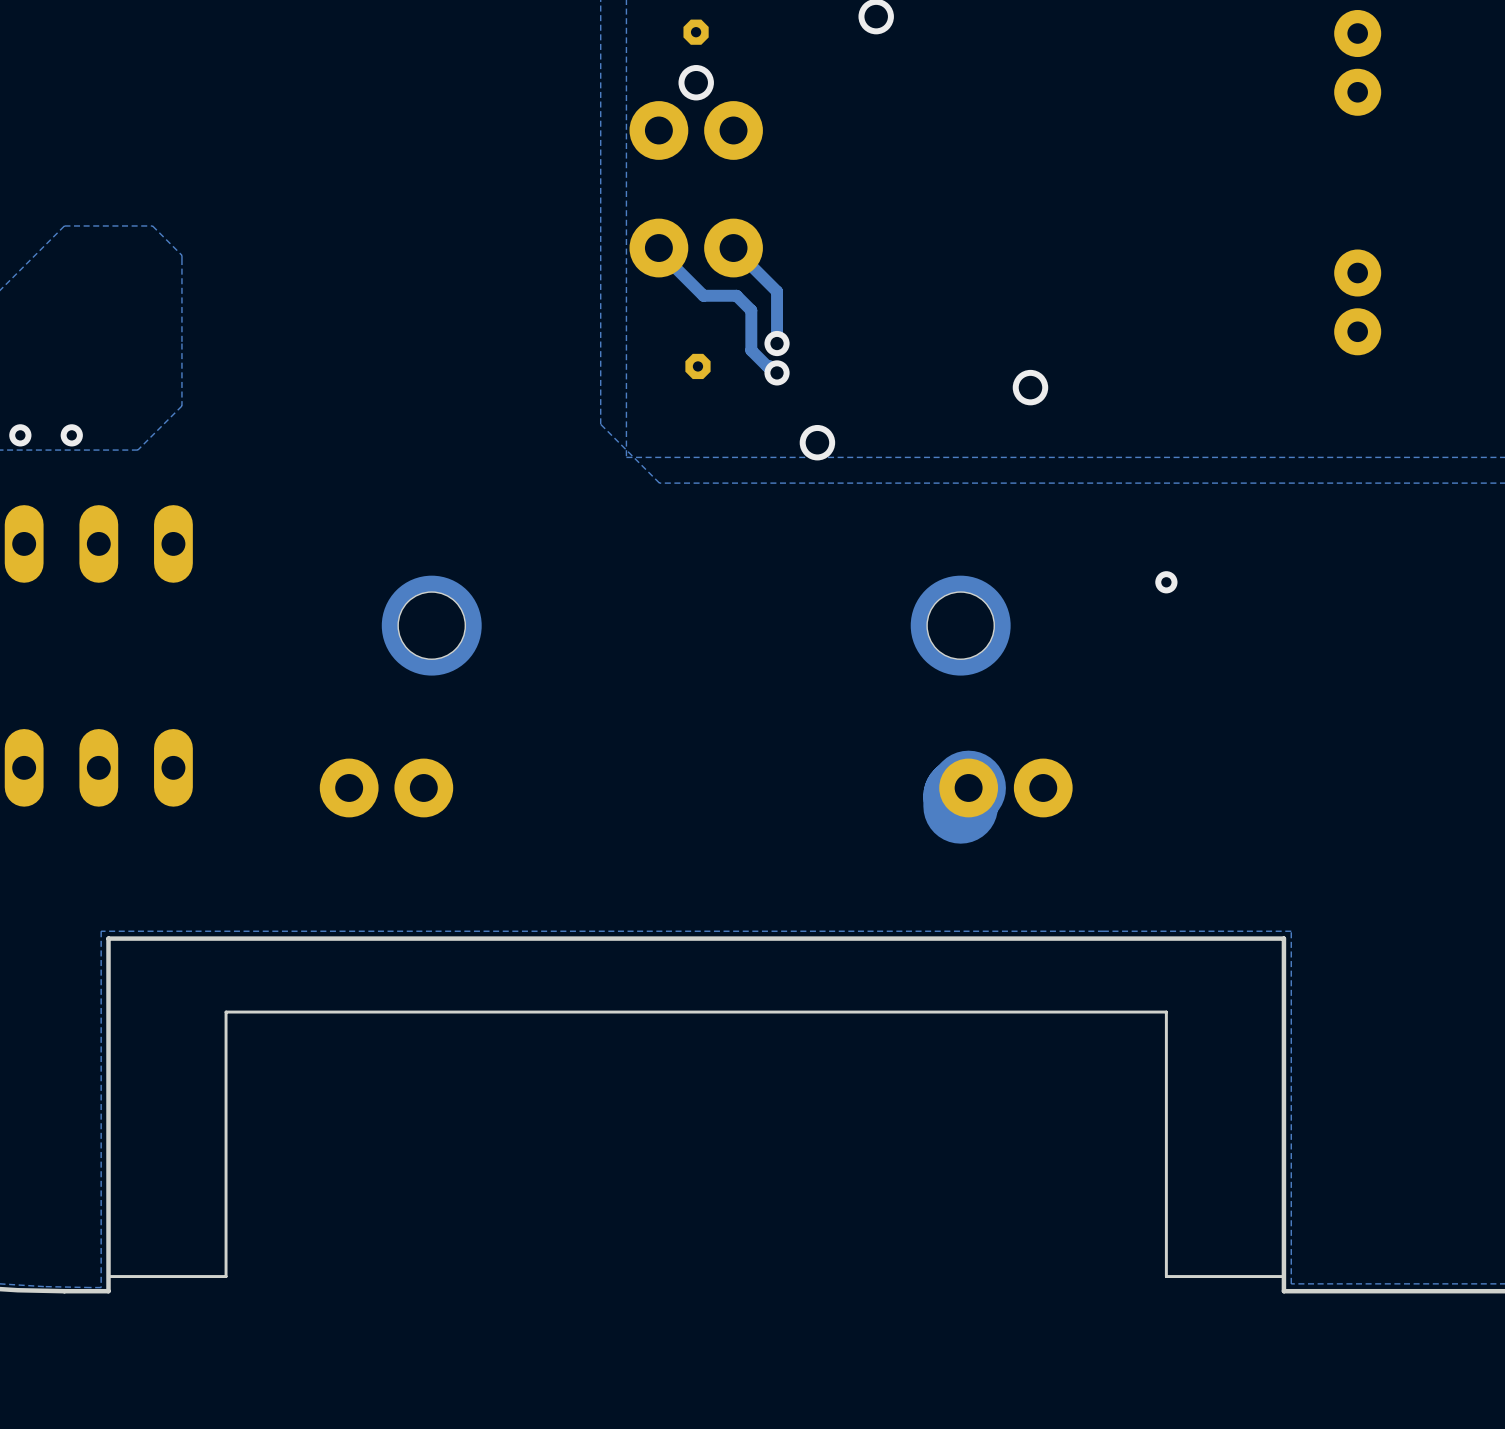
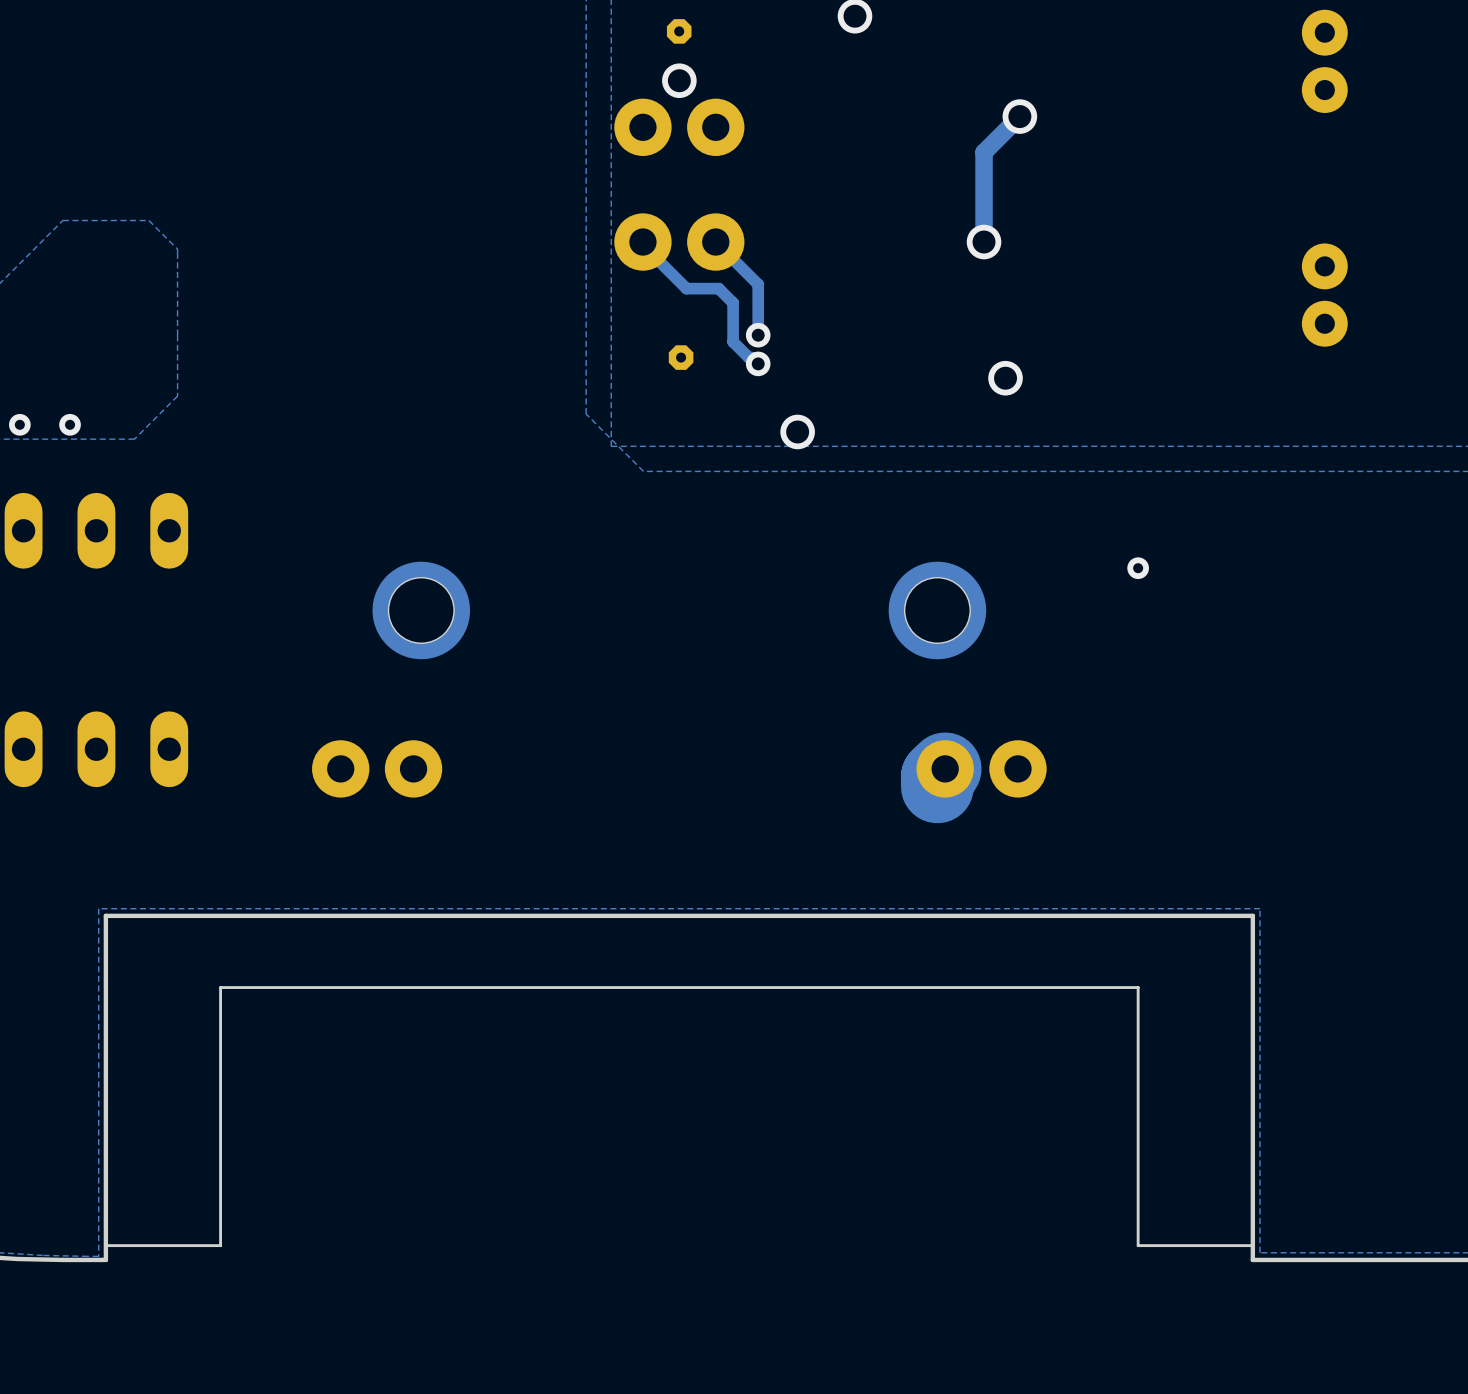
track: none -> (1019, 116) (984, 152) (984, 242)
via: none -> (1019, 116)
via: none -> (984, 242)

